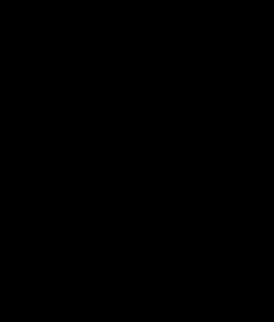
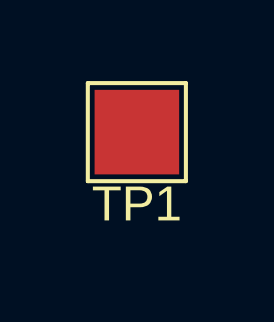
TP1: none -> (136, 132)

